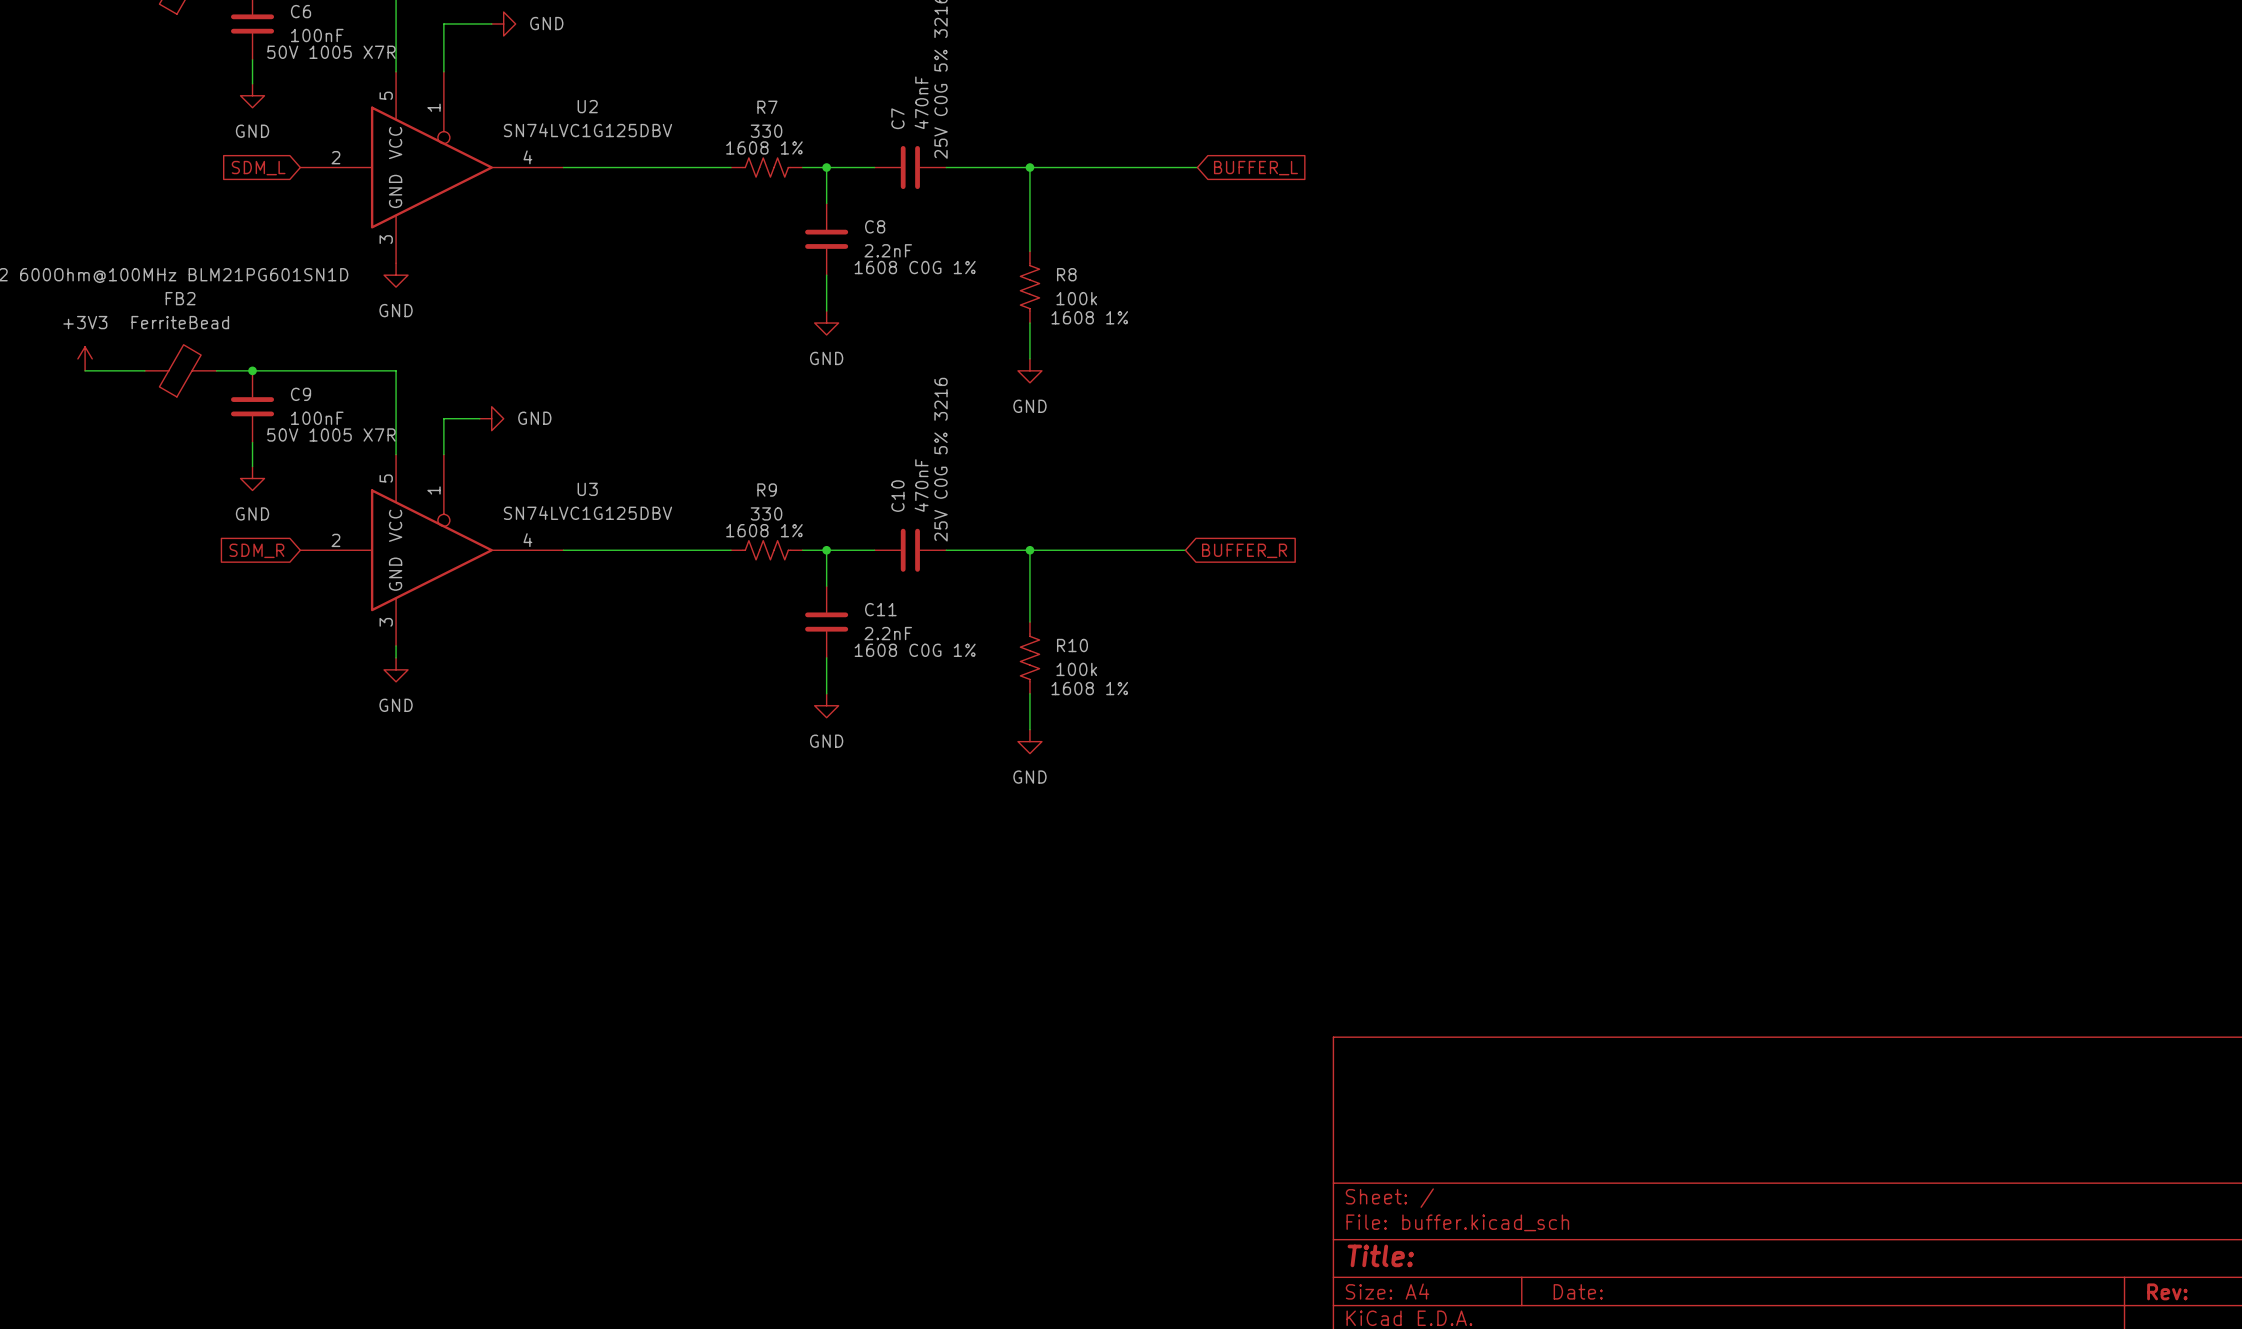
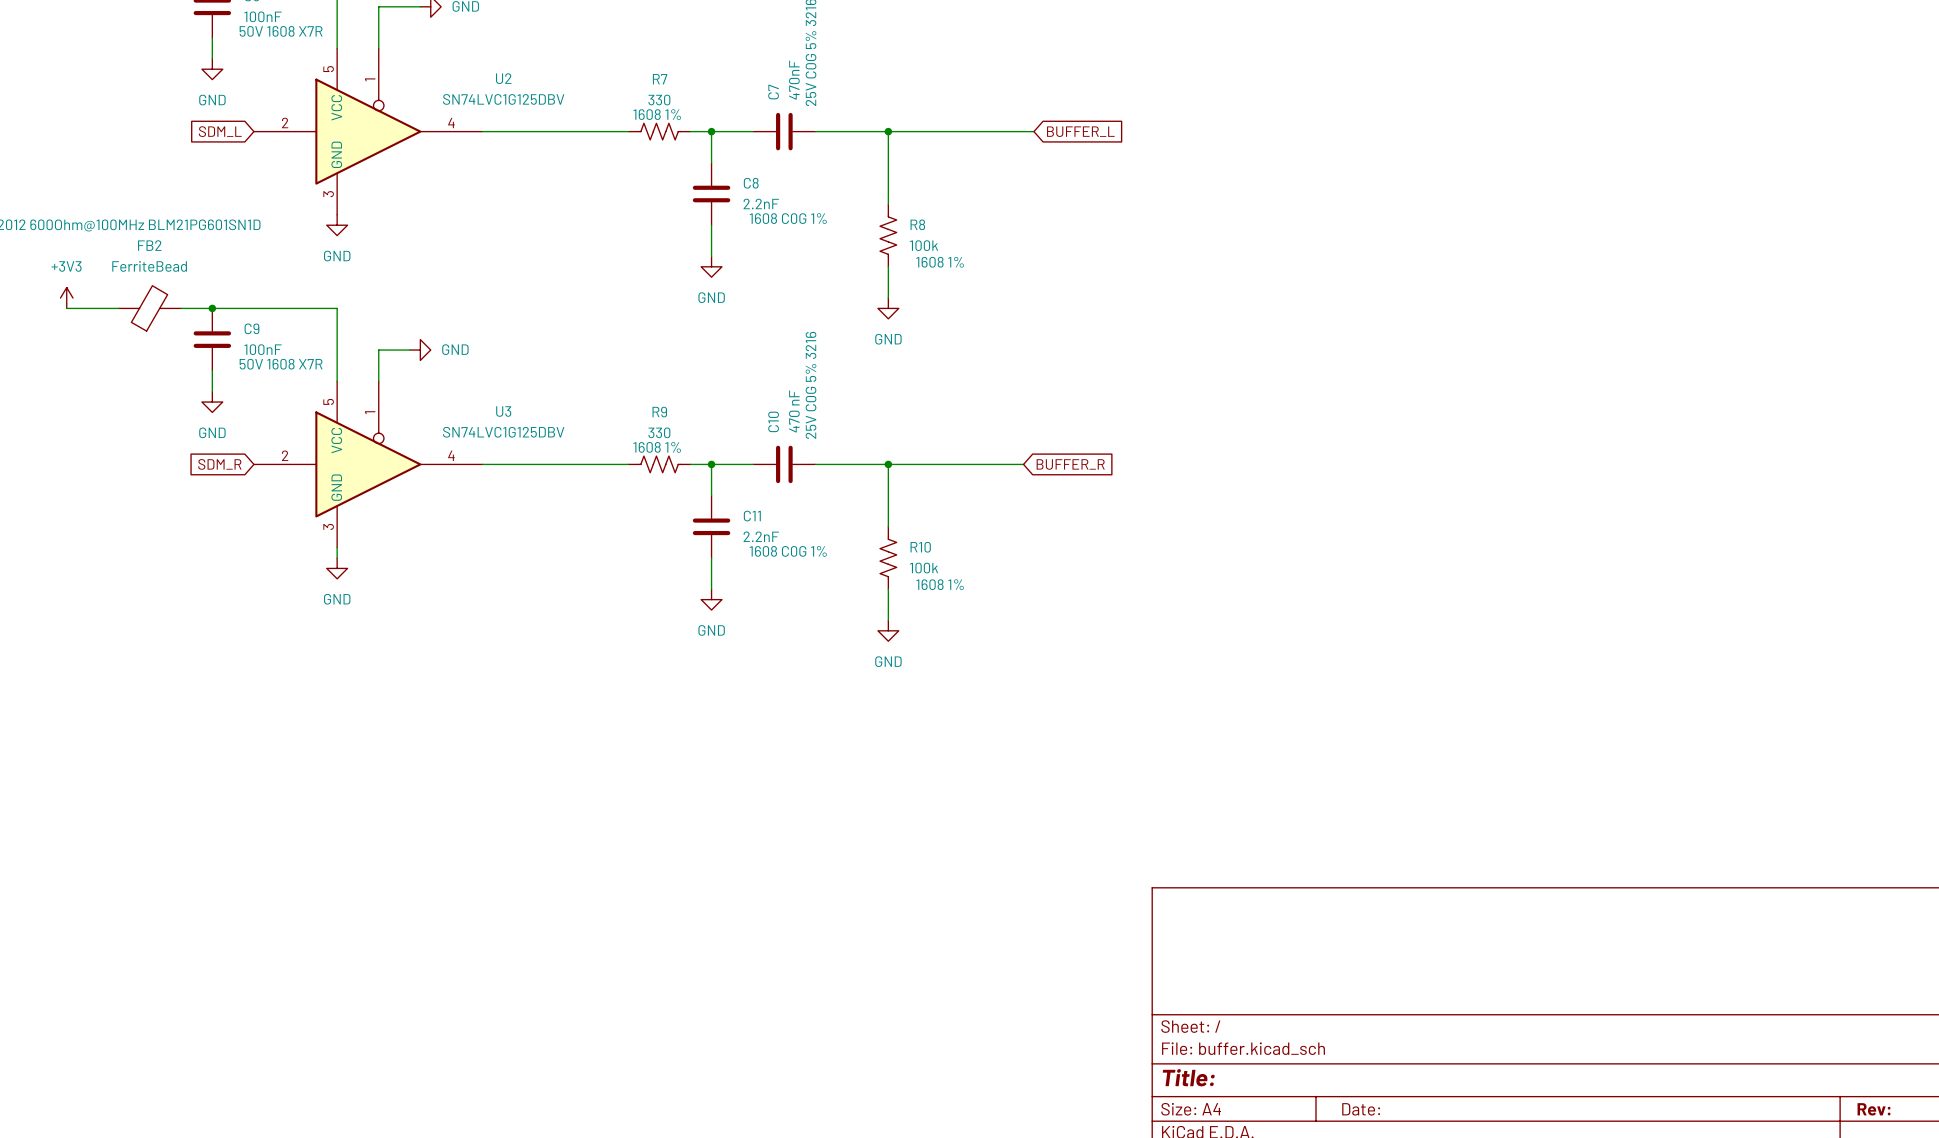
C6 text: 50V 1005 X7R (331, 52) -> 50V 1608 X7R (281, 31)
C9 text: 50V 1005 X7R (331, 435) -> 50V 1608 X7R (281, 364)
C10 value: 470nF (921, 485) -> 470 nF (794, 411)

